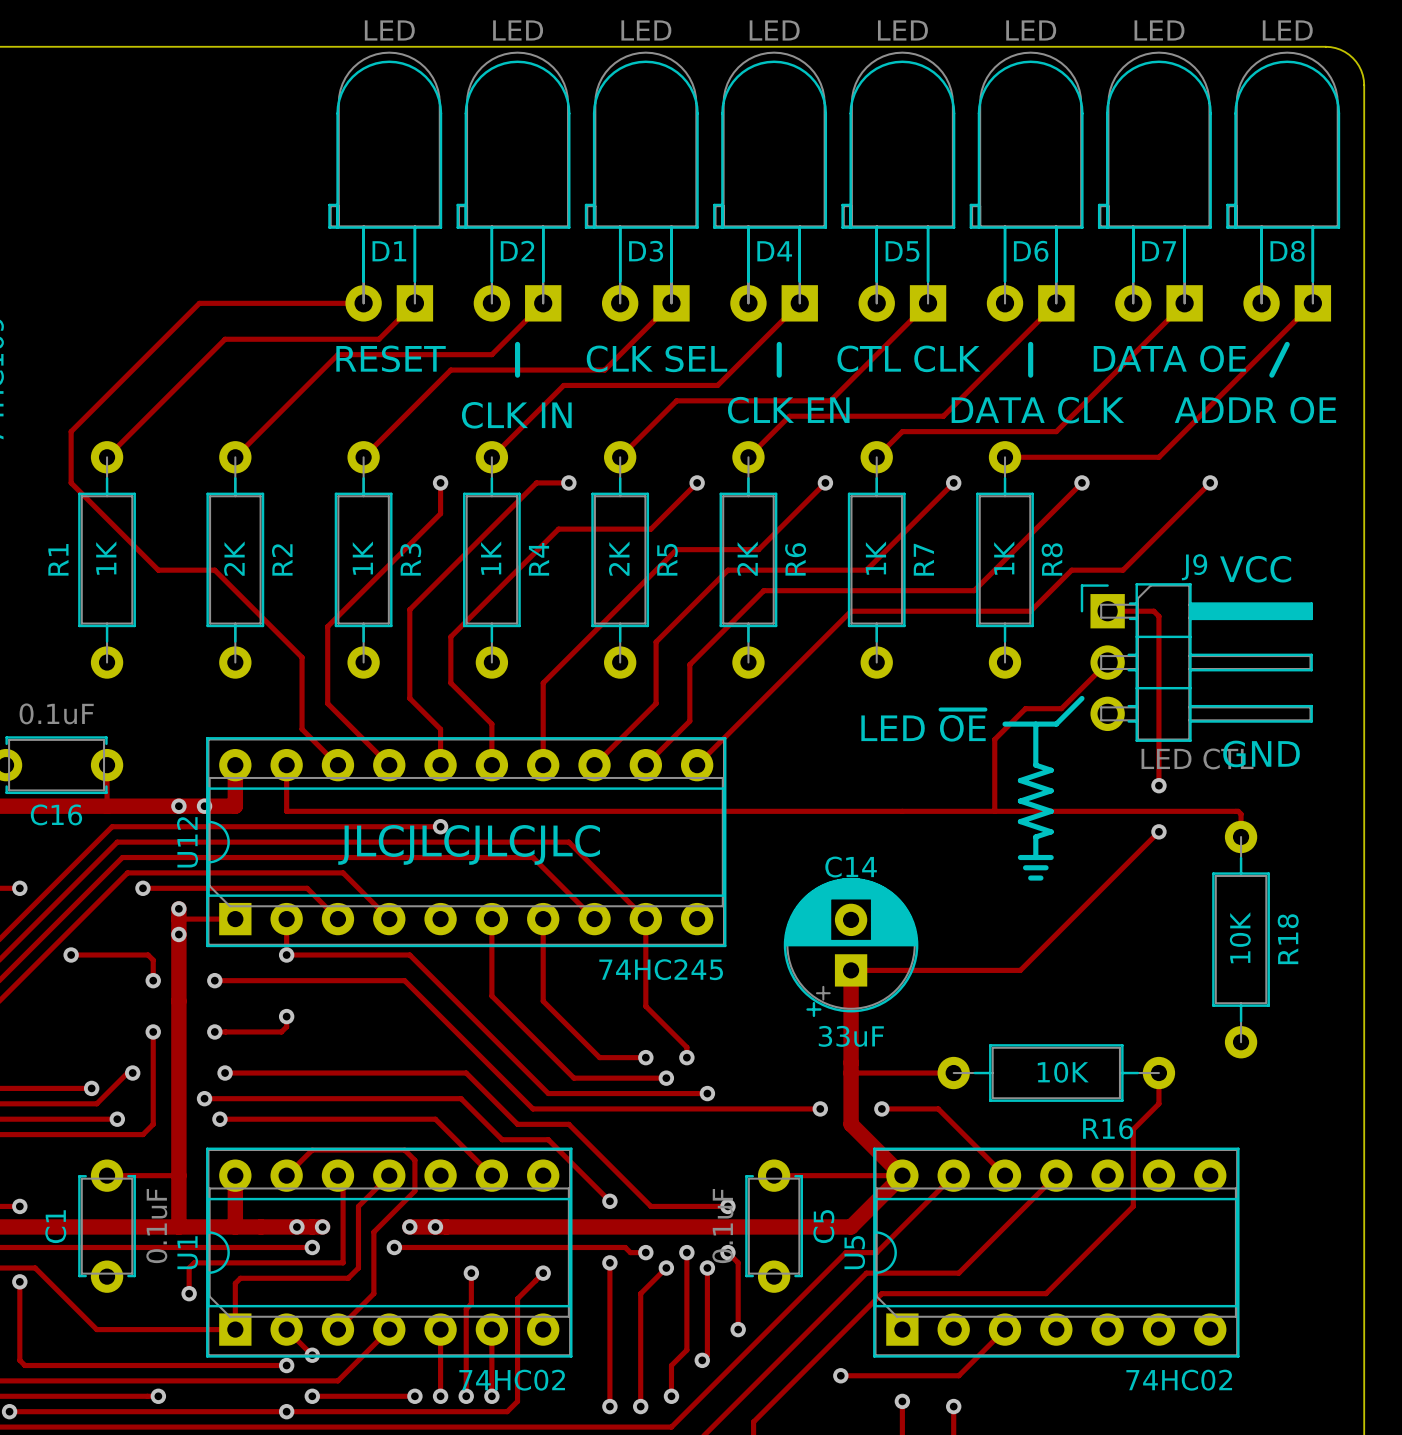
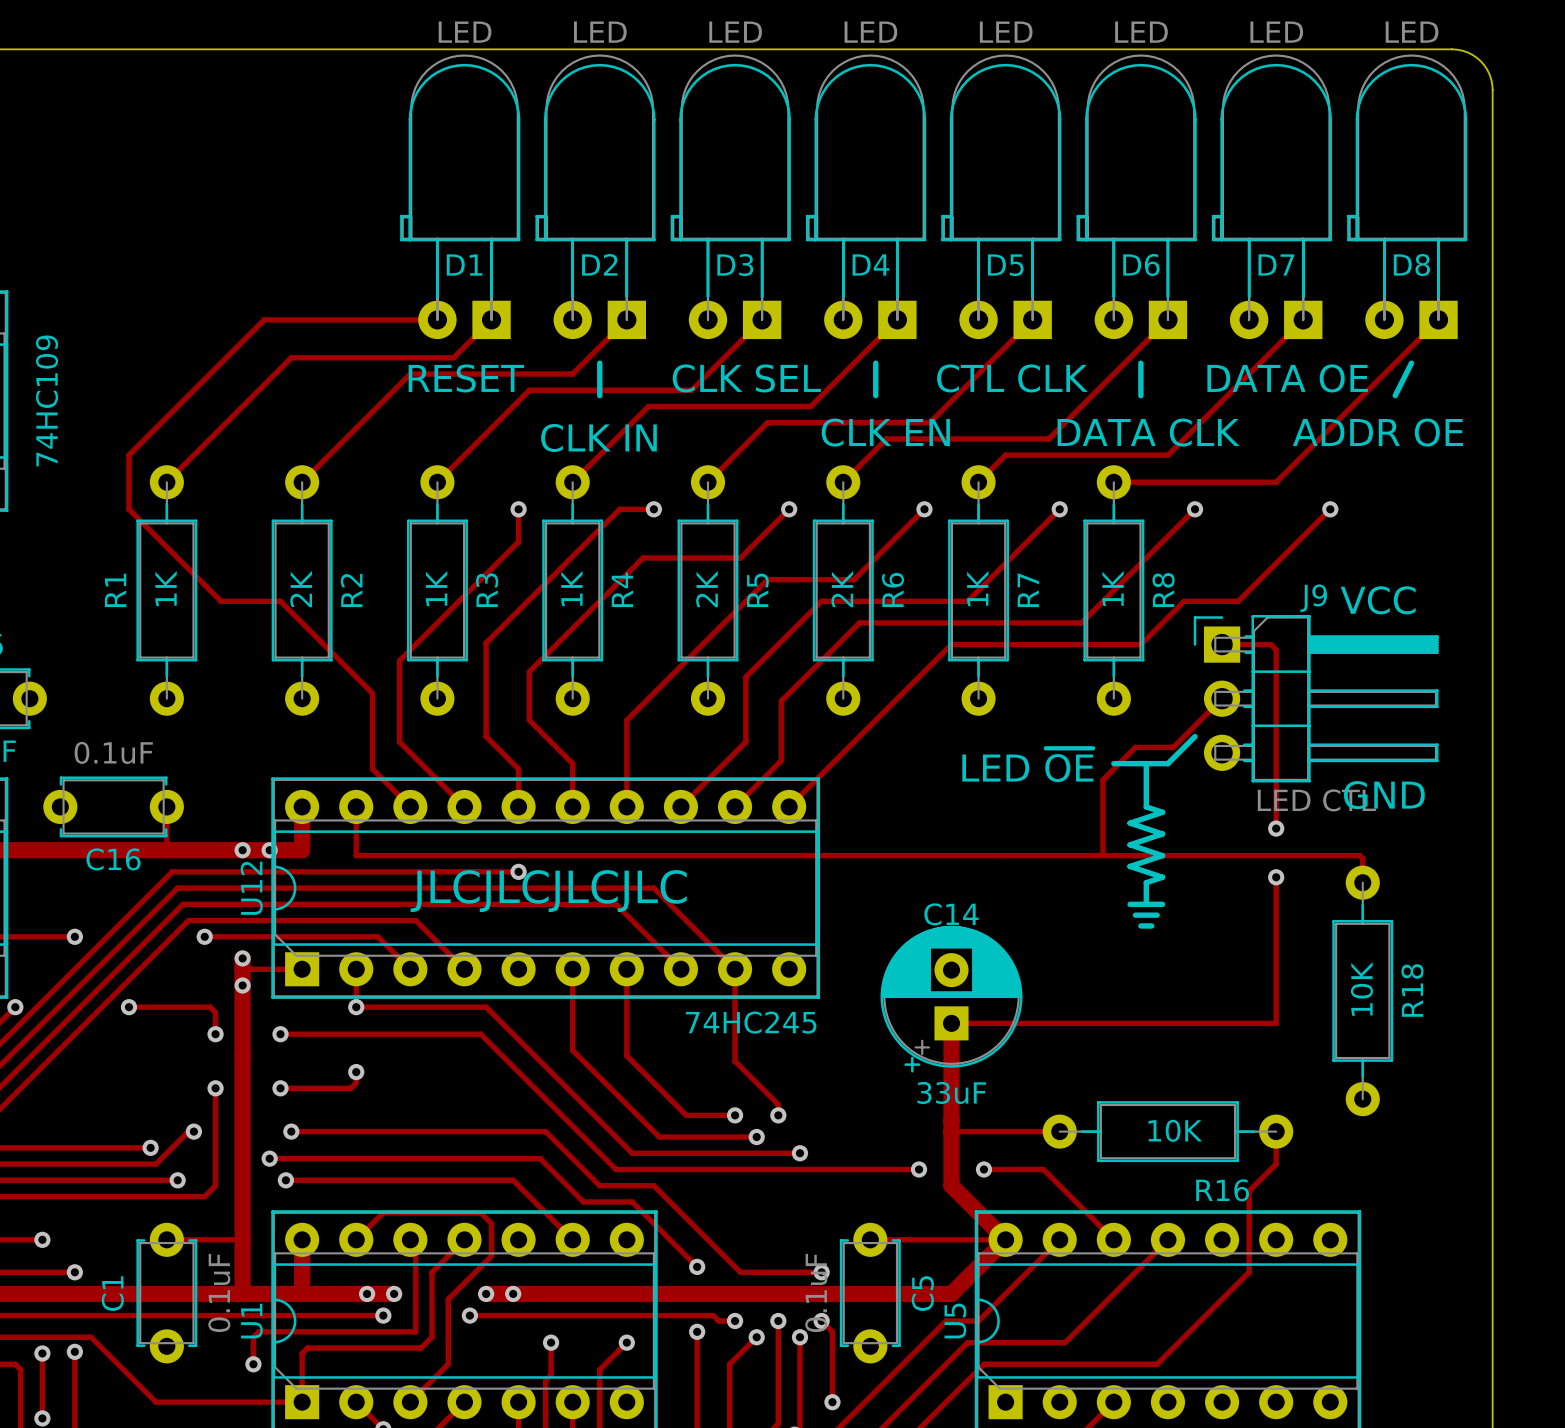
track: (1158, 831) (1020, 970) -> (1276, 877) (1276, 1023) (1130, 1023)

